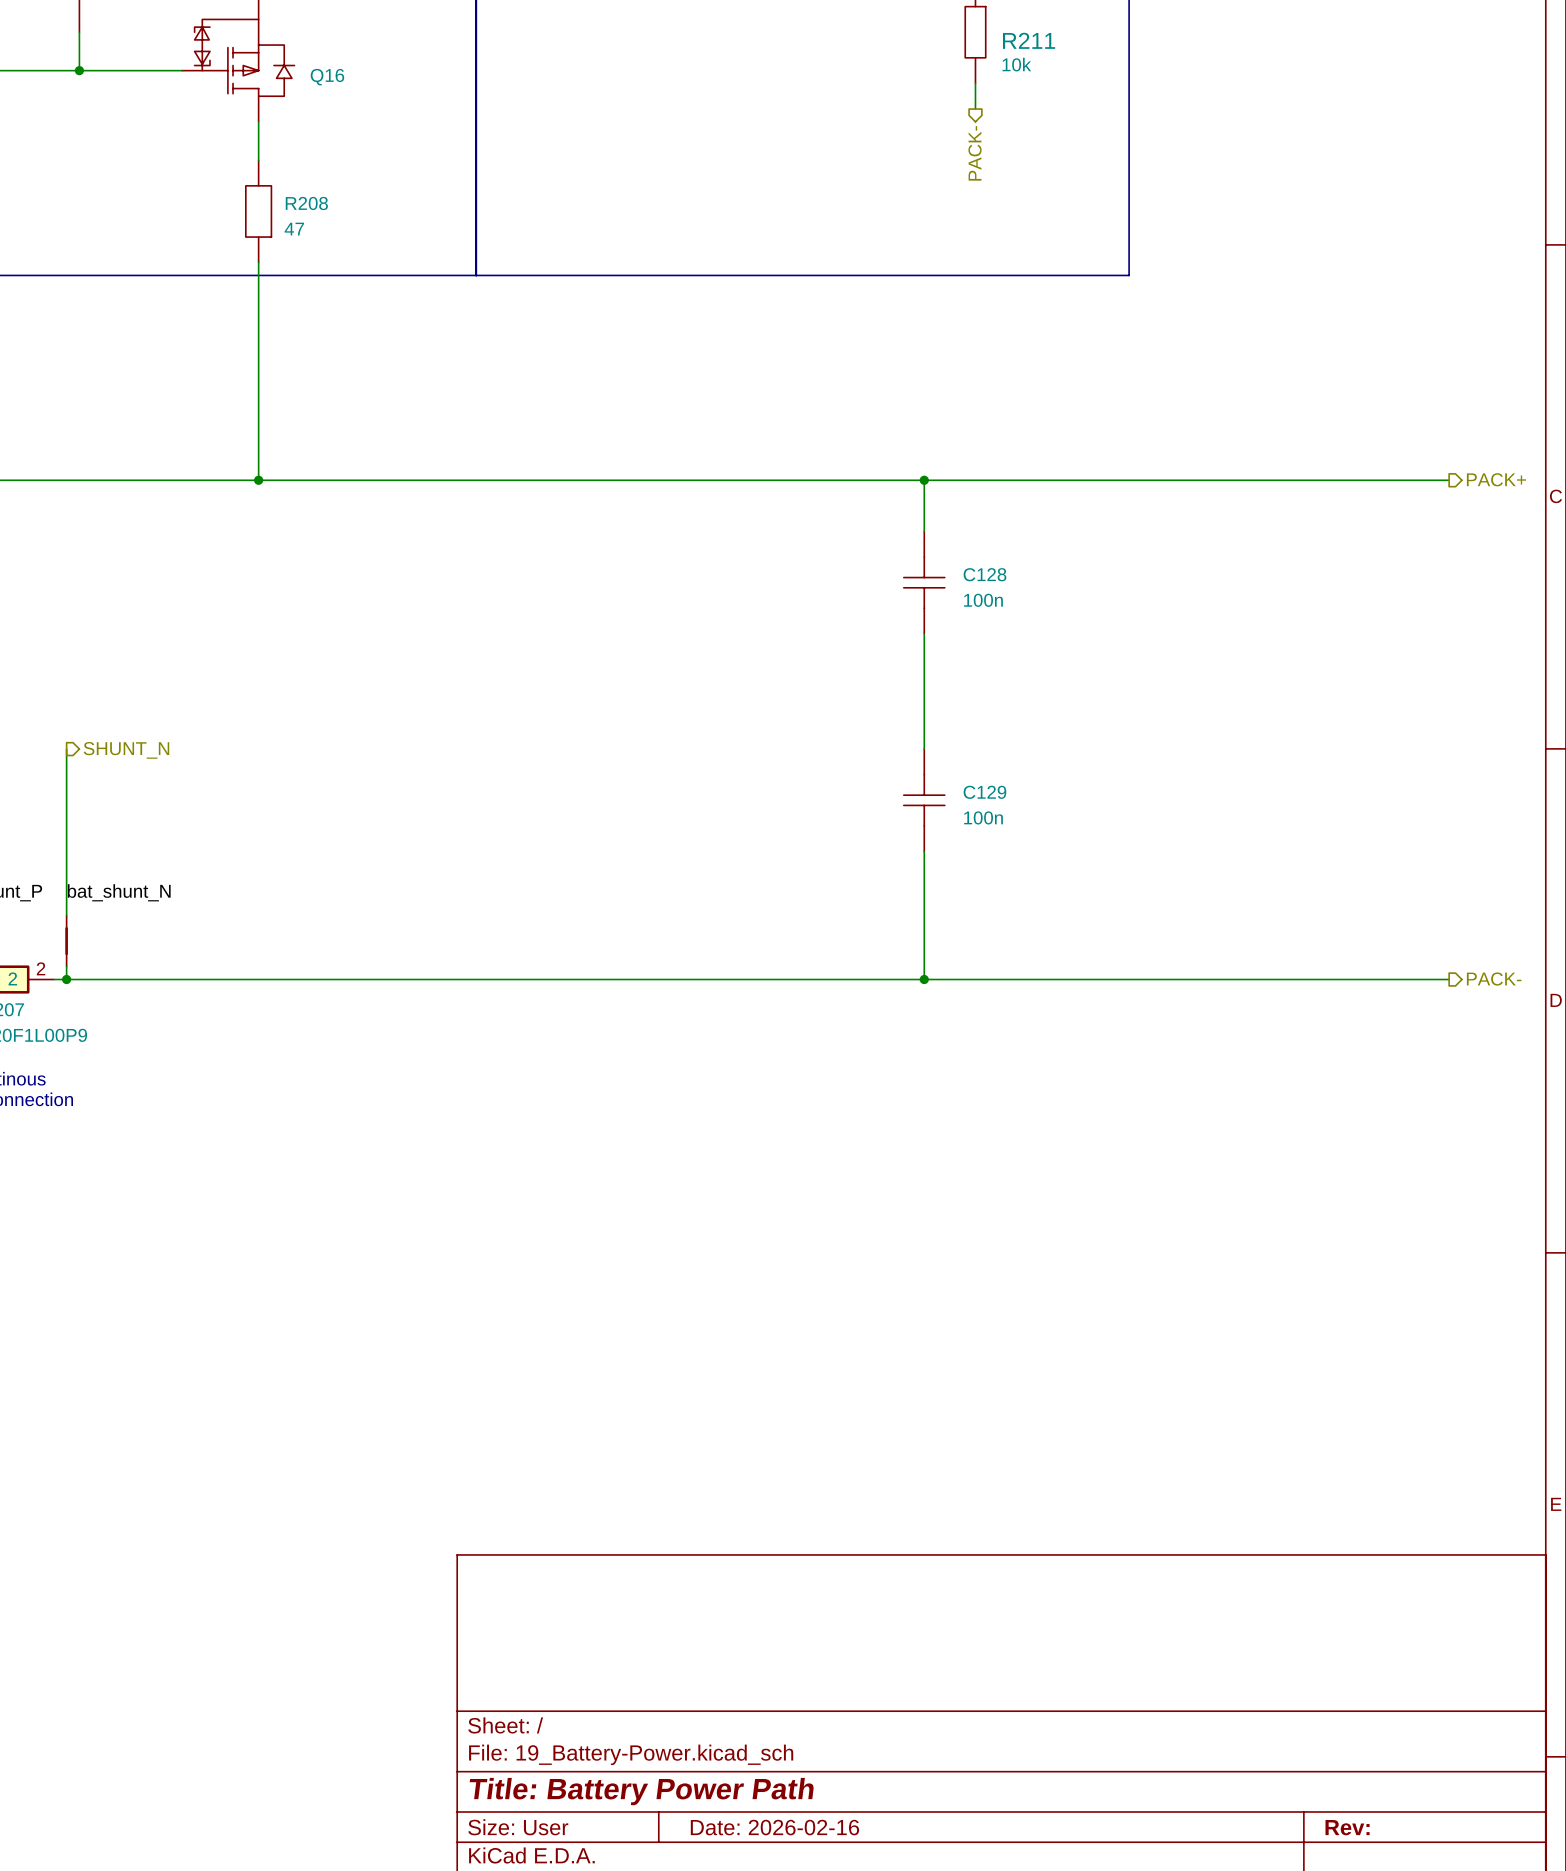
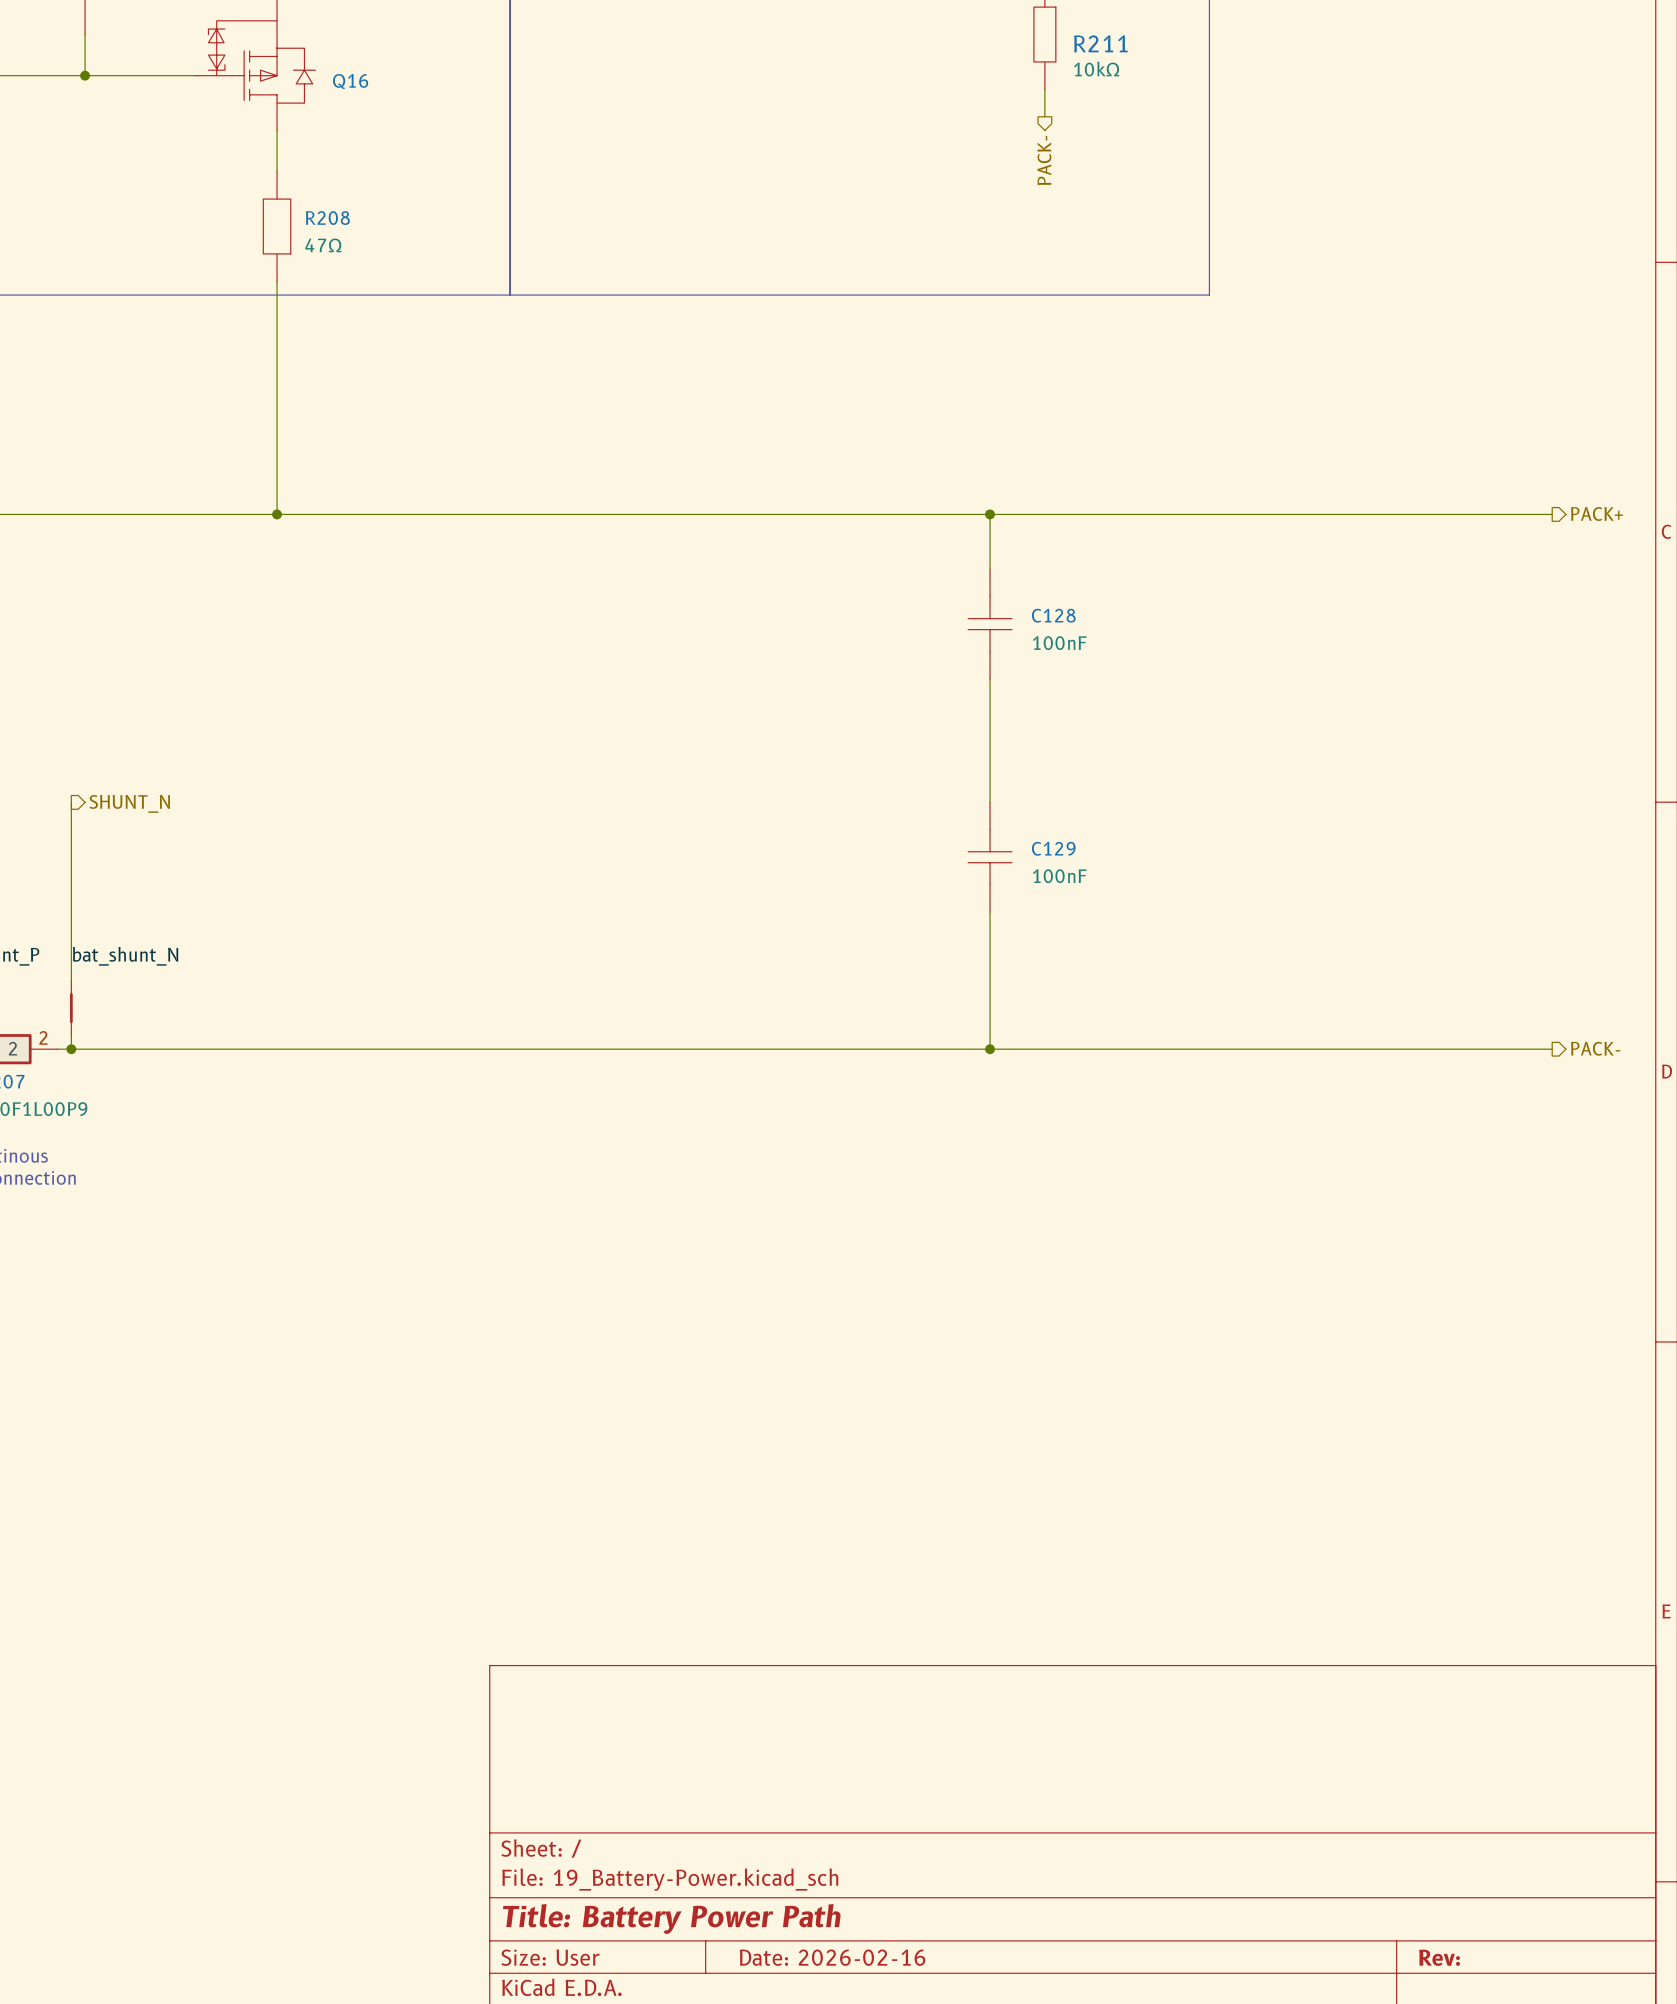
R211 value: 10k (1016, 64) -> 10kΩ (1096, 69)
R208 value: 47 (294, 229) -> 47Ω (323, 245)
C128 value: 100n (983, 600) -> 100nF (1059, 643)
C129 value: 100n (983, 817) -> 100nF (1059, 876)

